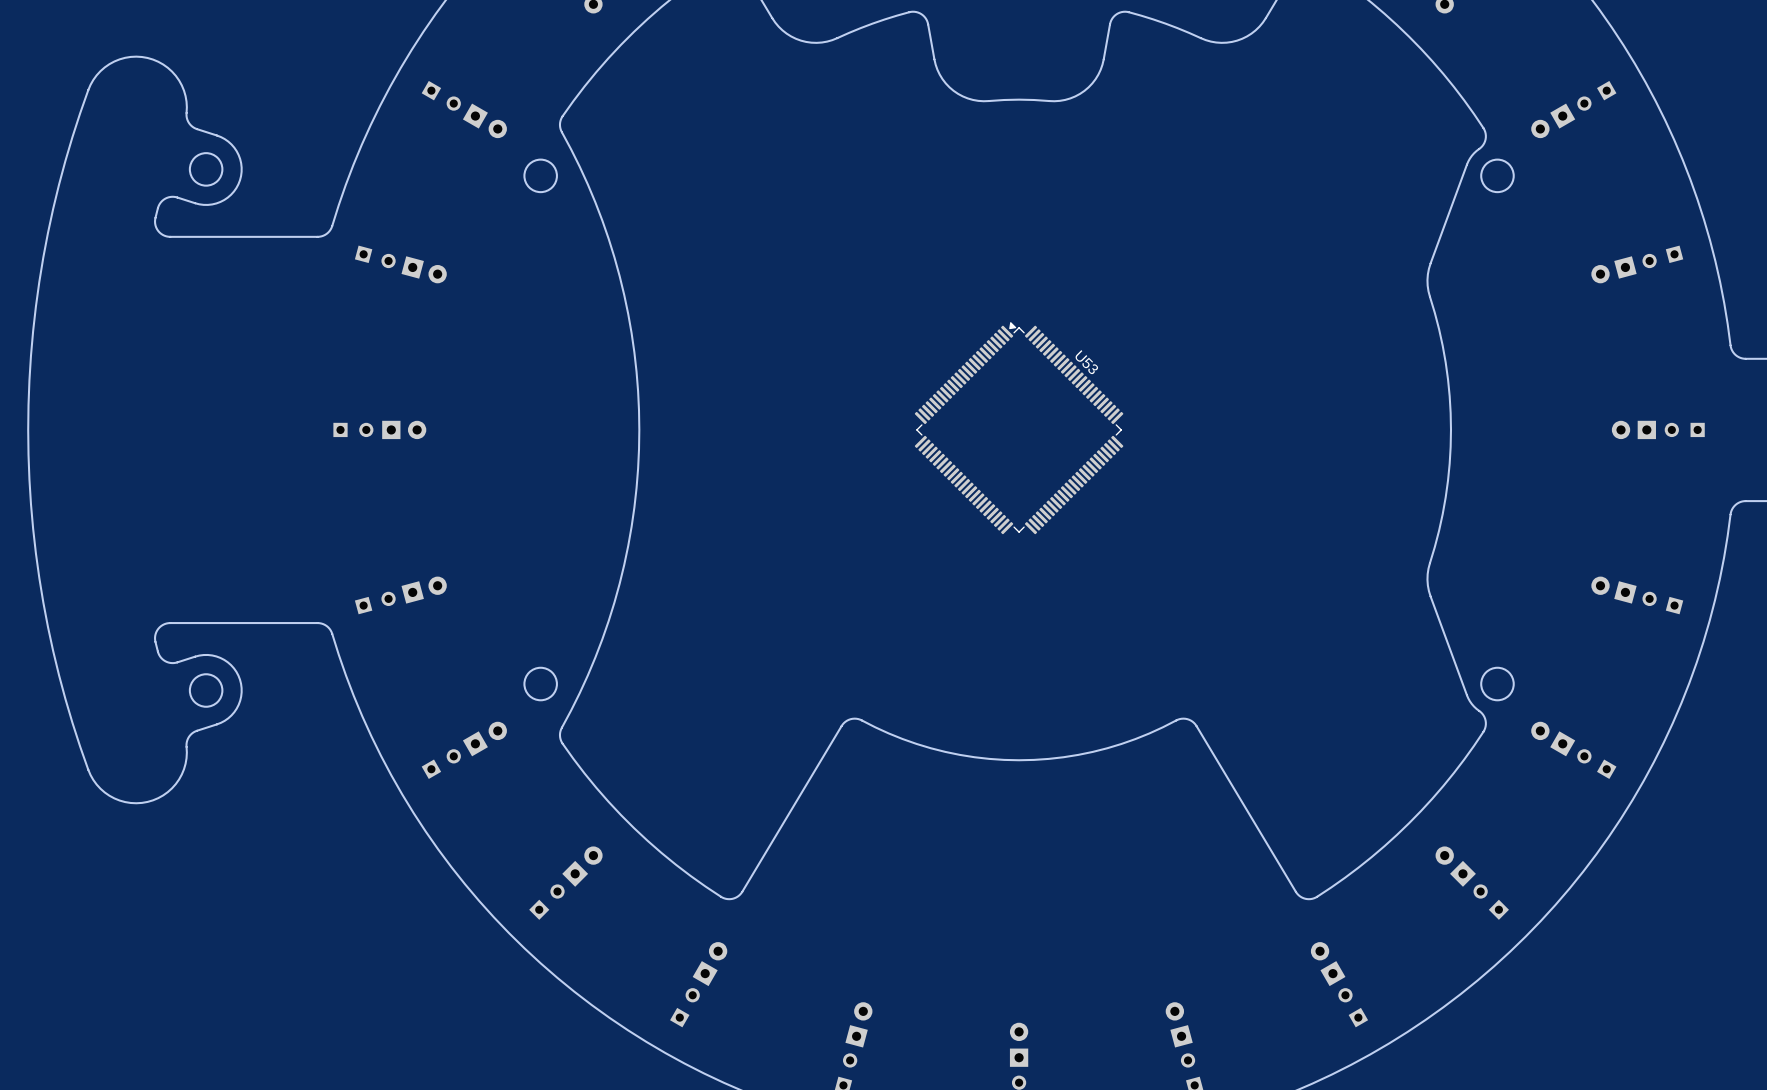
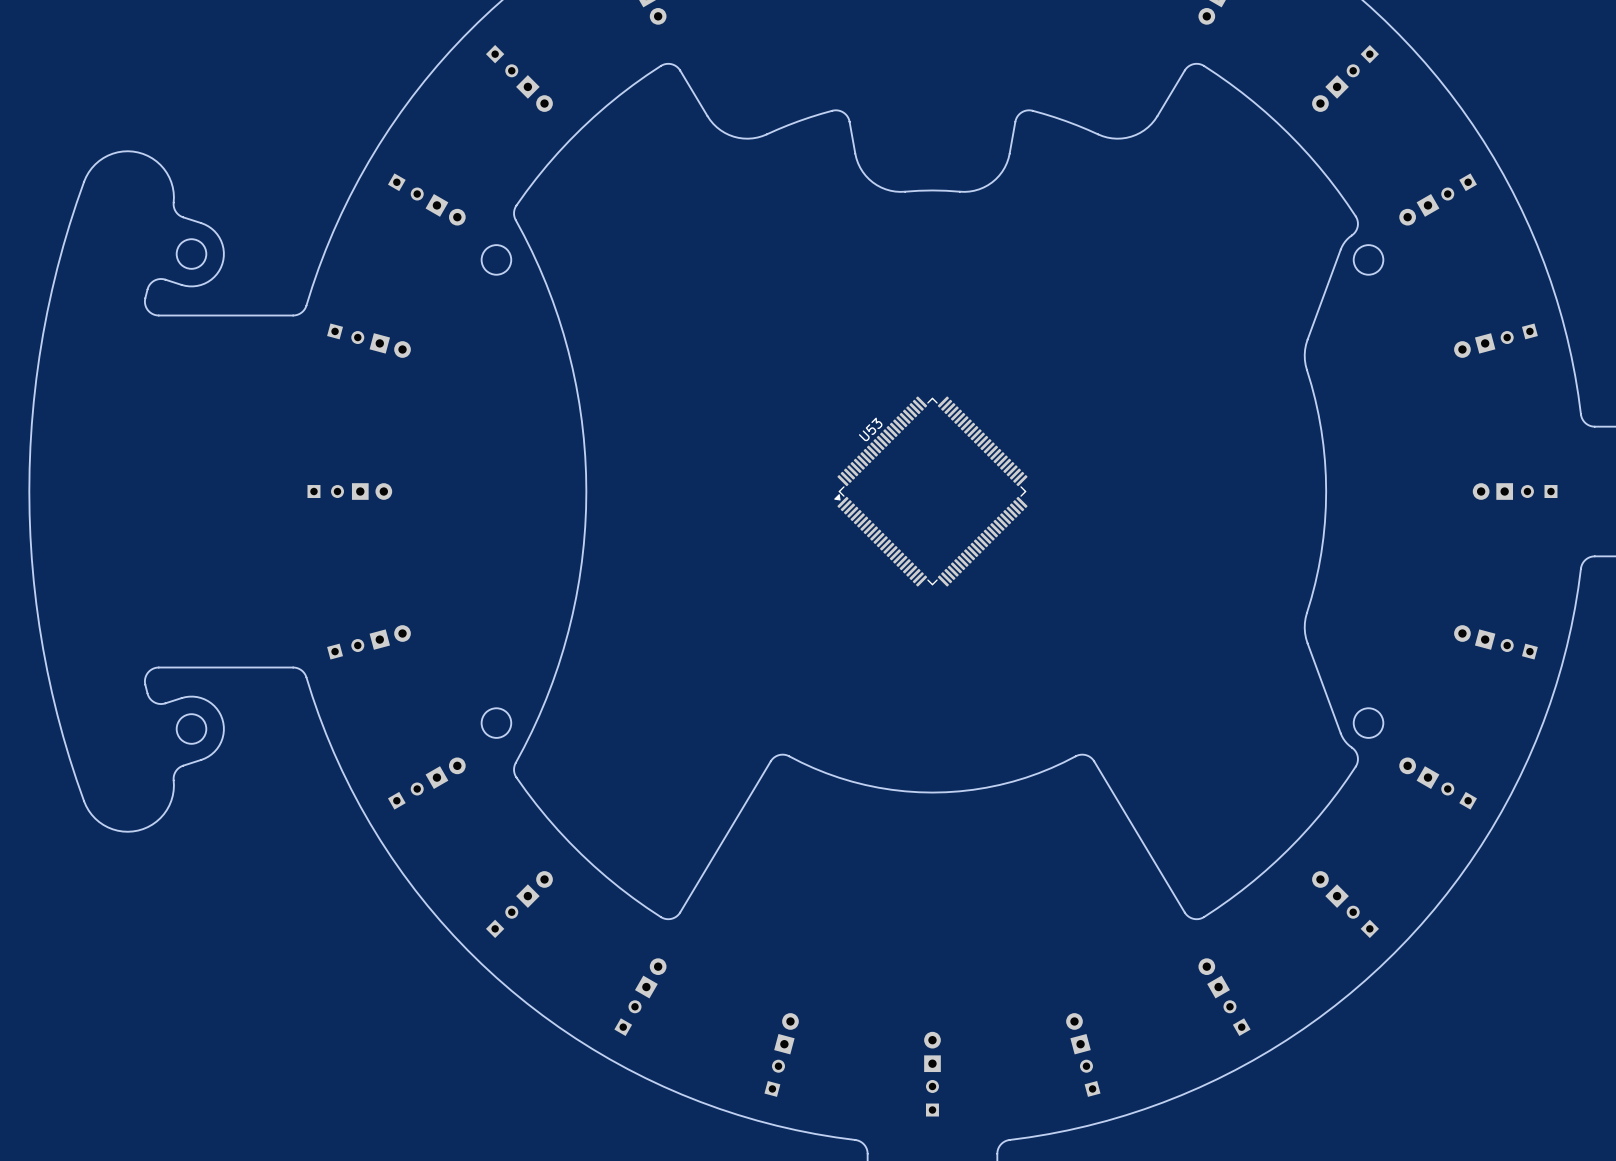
U53 rotation: 0° (1019, 428) -> 90° counterclockwise (930, 491)

